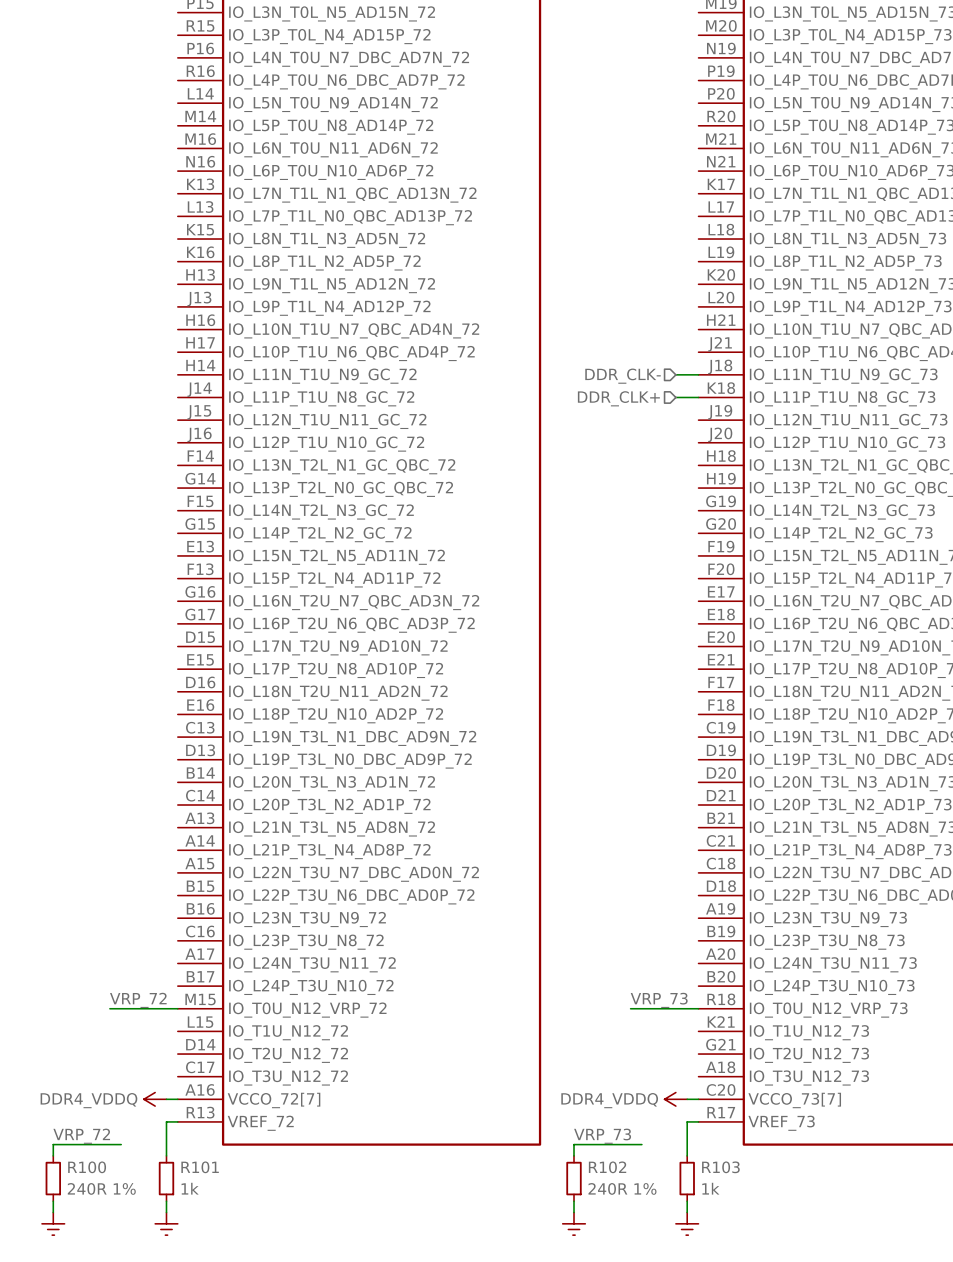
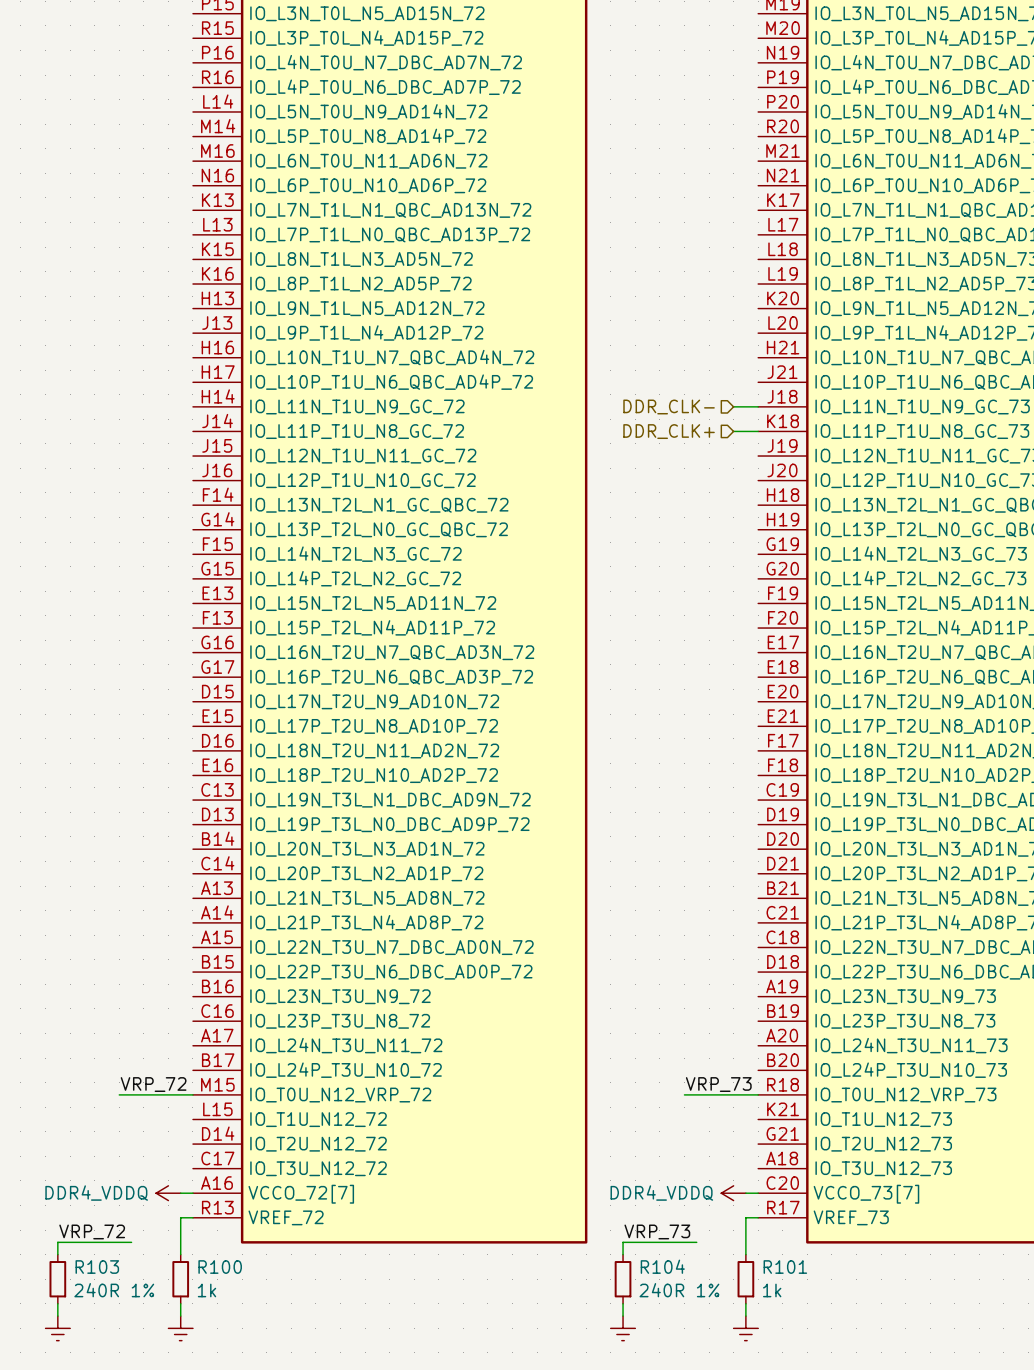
R100 name: R100 (87, 1167) -> R103 (97, 1267)
R101 name: R101 (200, 1167) -> R100 (220, 1267)
R102 name: R102 (607, 1167) -> R104 (662, 1266)
R103 name: R103 (720, 1167) -> R101 (785, 1267)

